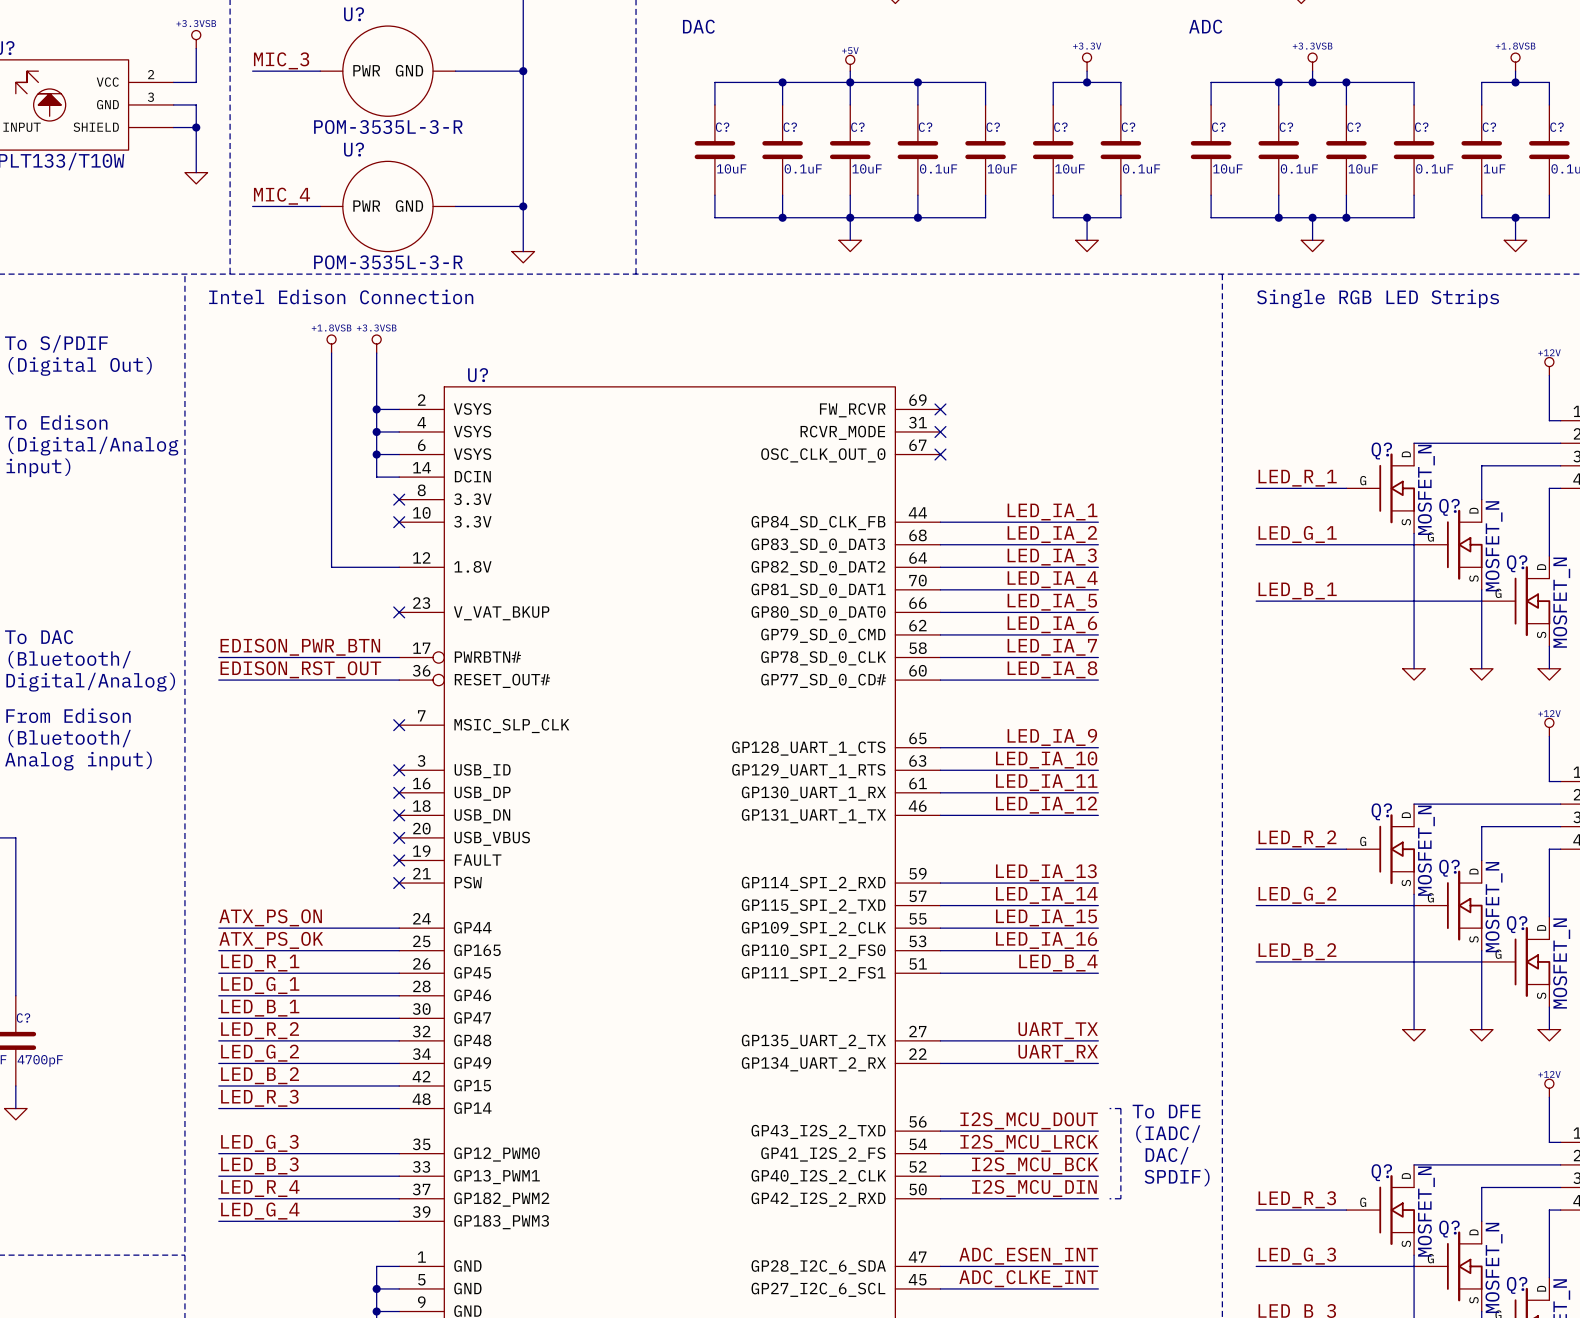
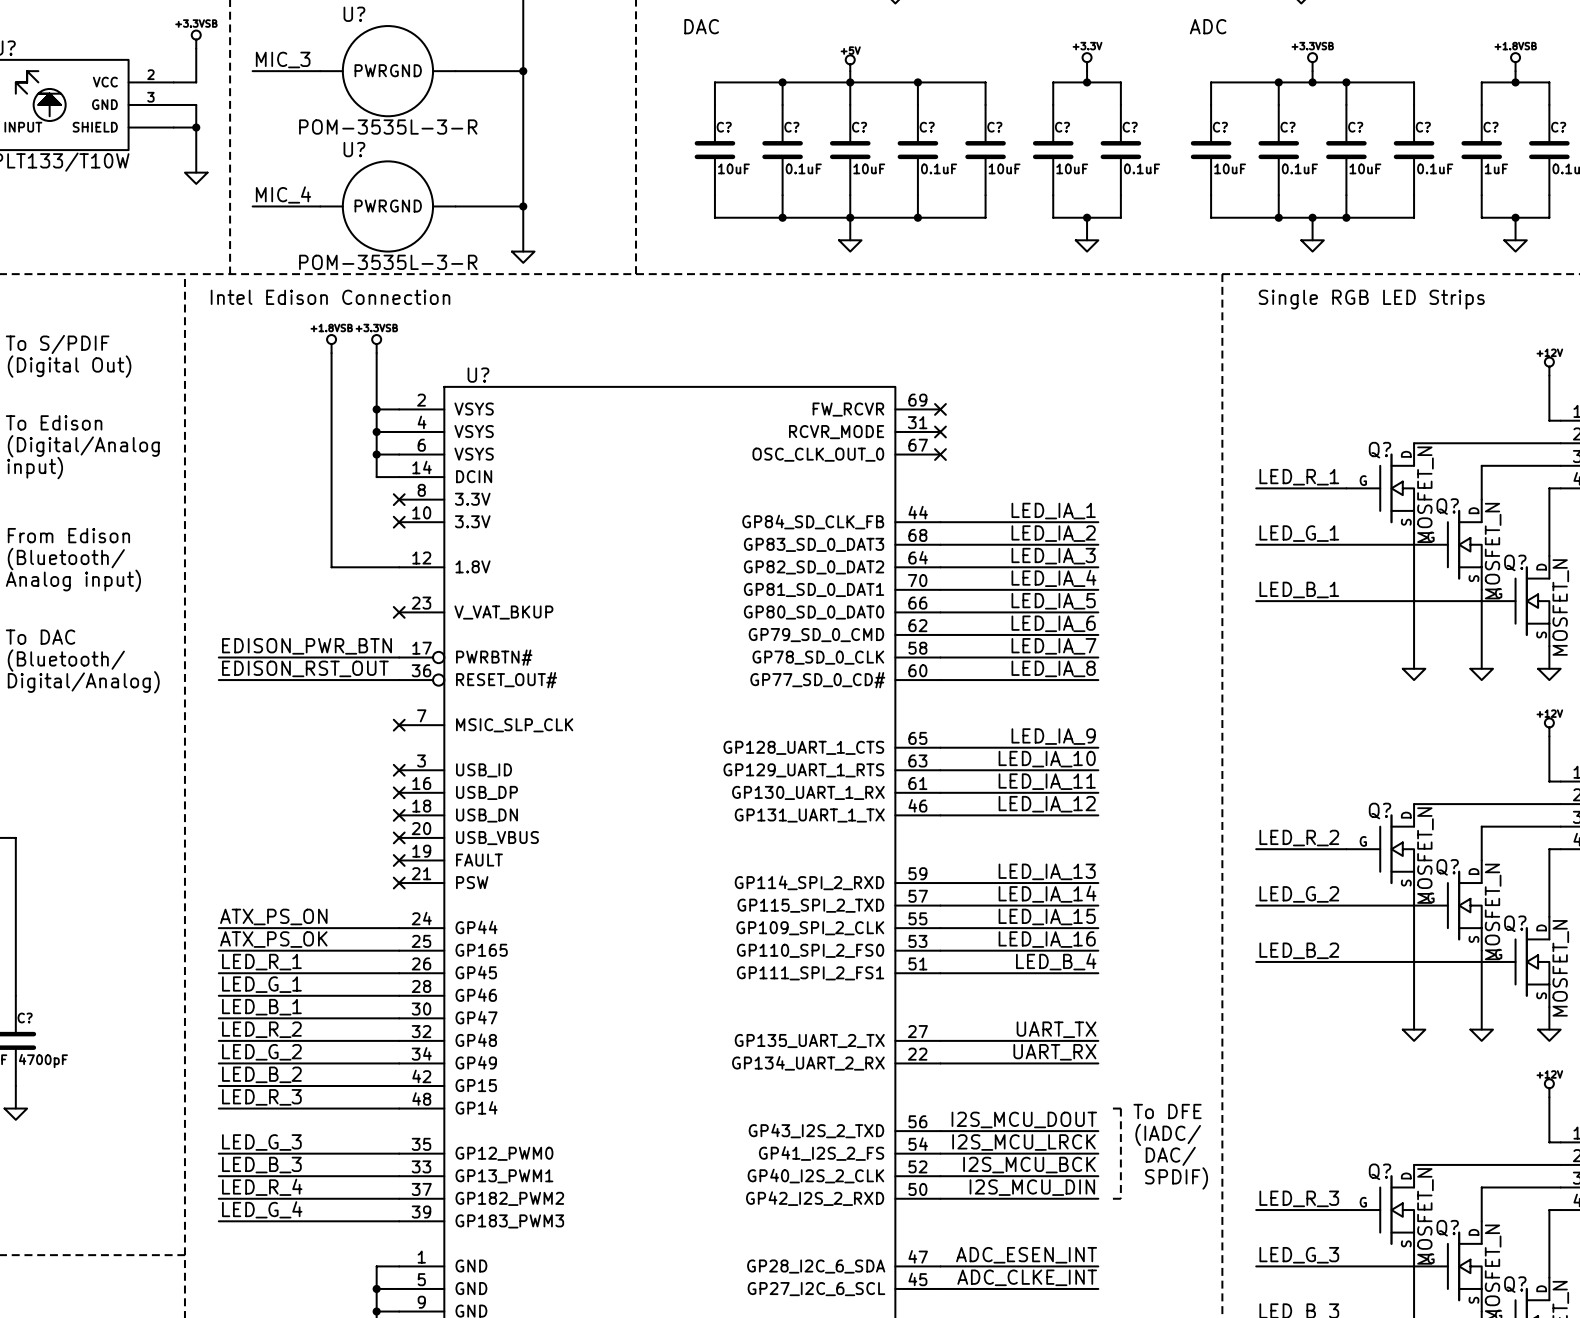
text position: From Edison (68, 715) -> From Edison (68, 535)
text position: (Bluetooth/ (69, 738) -> (Bluetooth/ (66, 559)
text position: Analog input) (78, 761) -> Analog input) (73, 580)

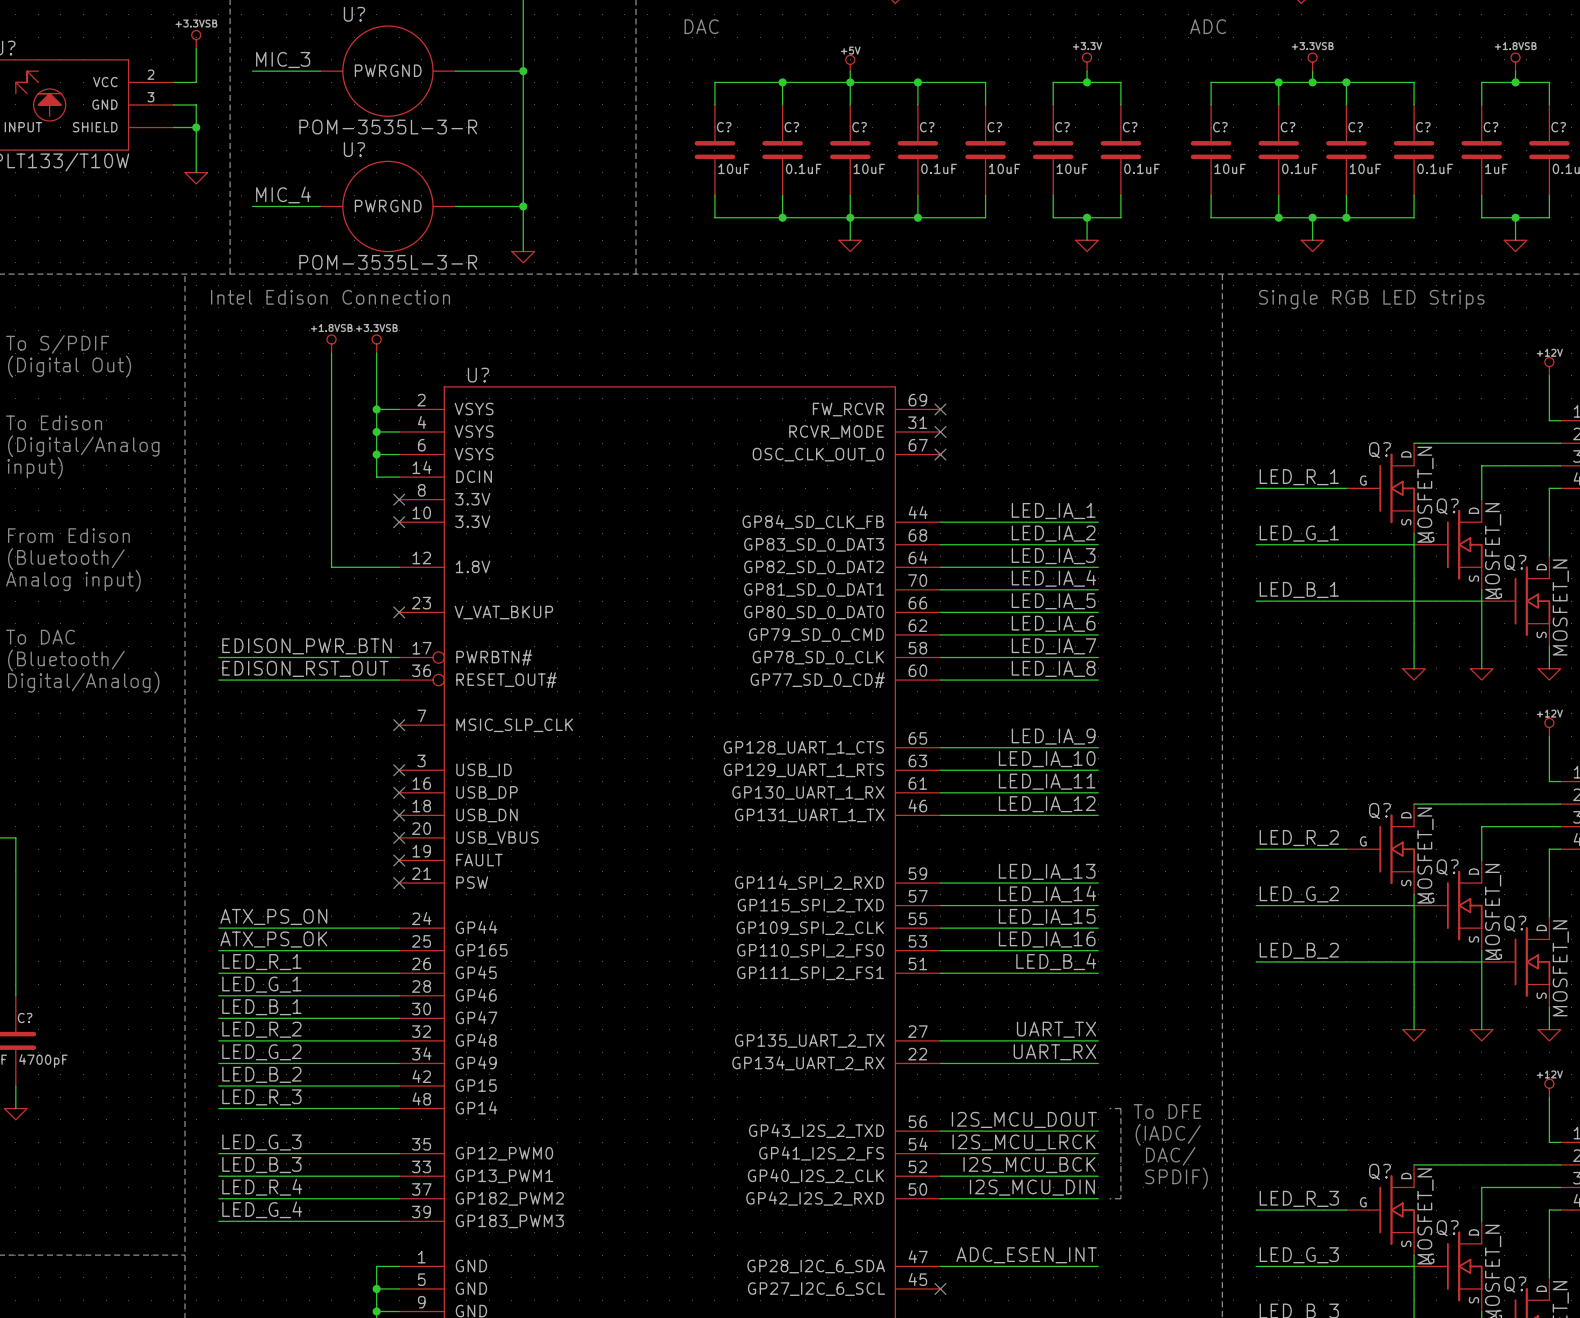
label: ADC_CLKE_INT (1027, 1277) -> none
wire: (940, 1288) (1098, 1288) -> none
no-connect mark: none -> (940, 1288)

